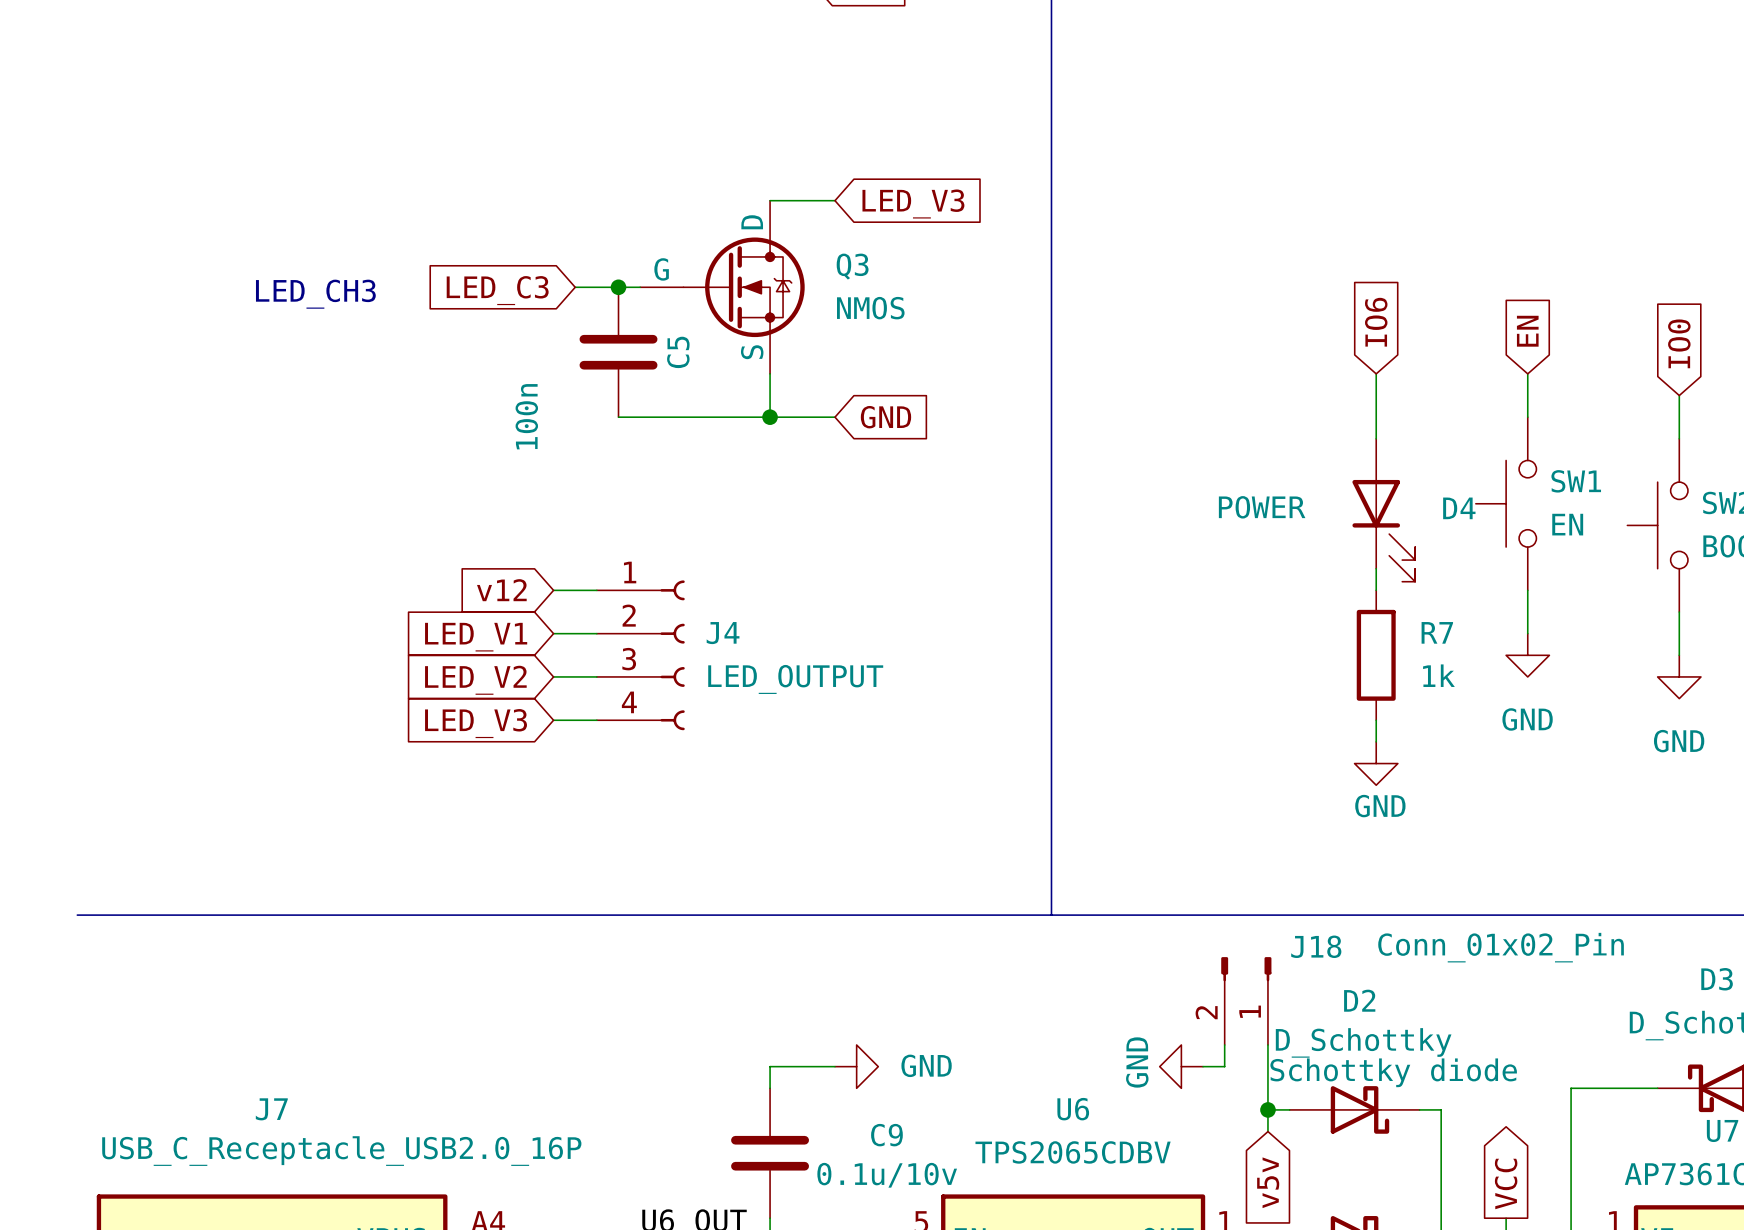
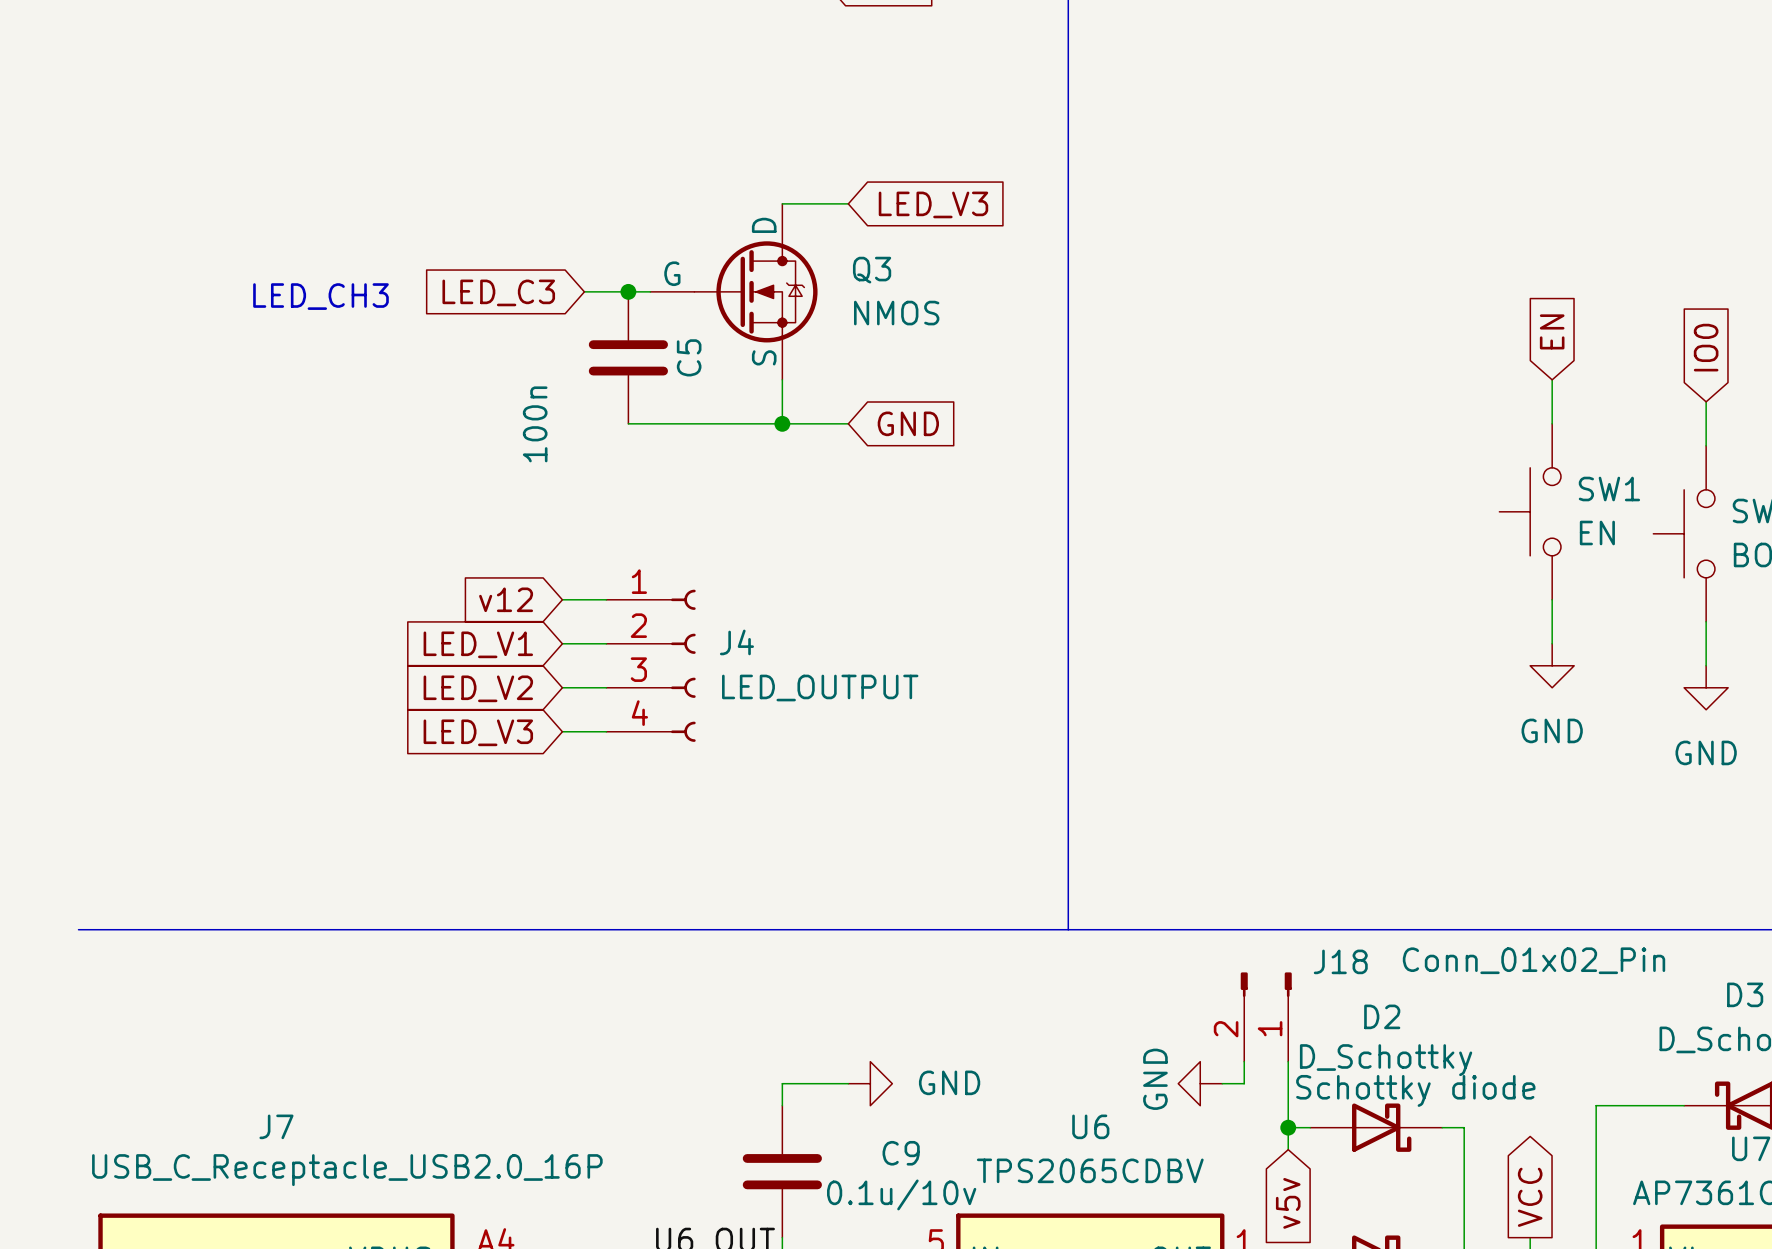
global label: IO6 (1376, 322) -> none
wire: (1376, 373) (1376, 438) -> none
D4: POWER (1383, 510) -> none
wire: (1376, 568) (1376, 590) -> none
R7: 1k (1376, 655) -> none
wire: (1376, 720) (1376, 741) -> none
power symbol: GND (1376, 763) -> none

